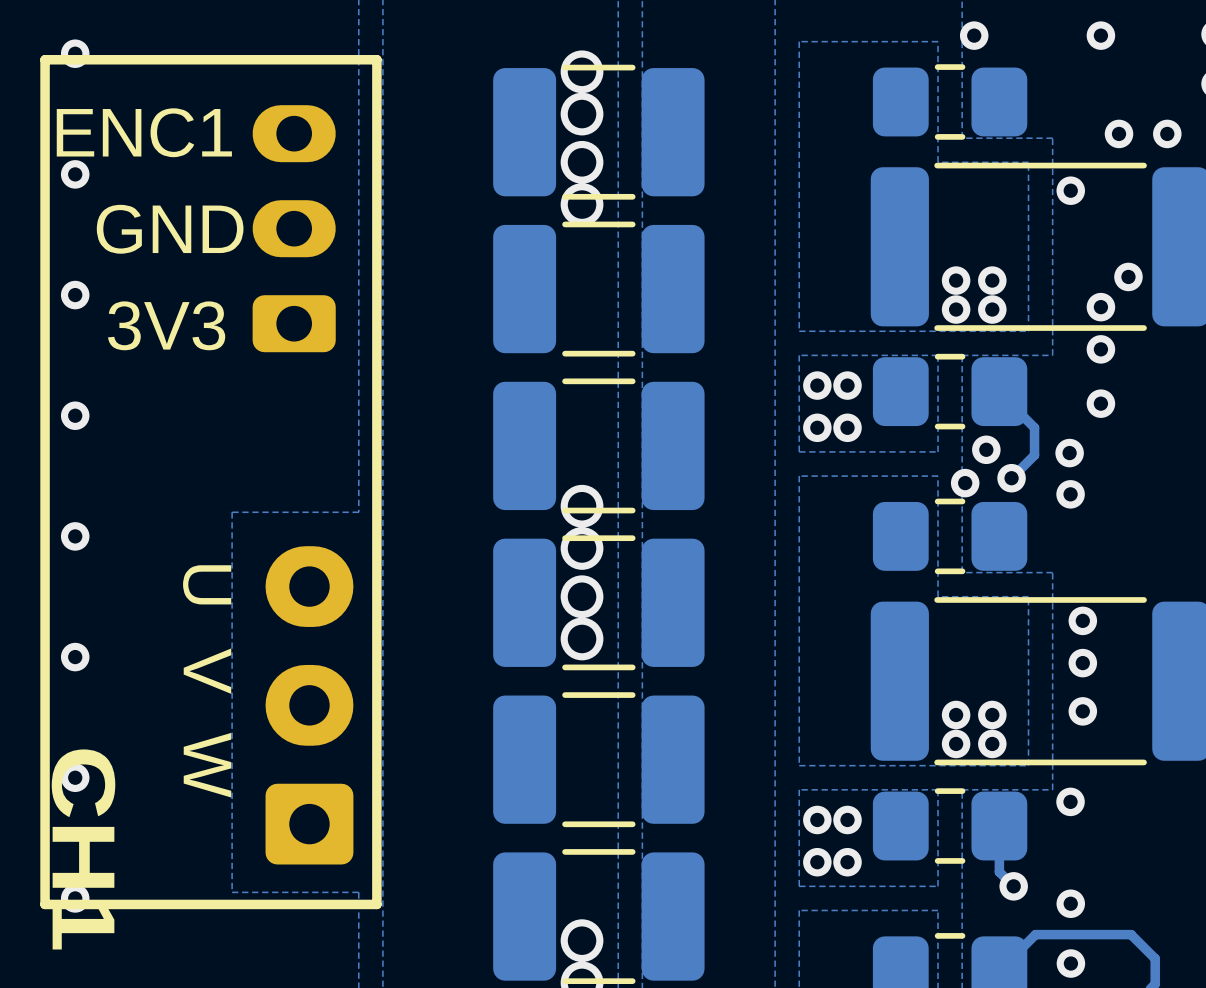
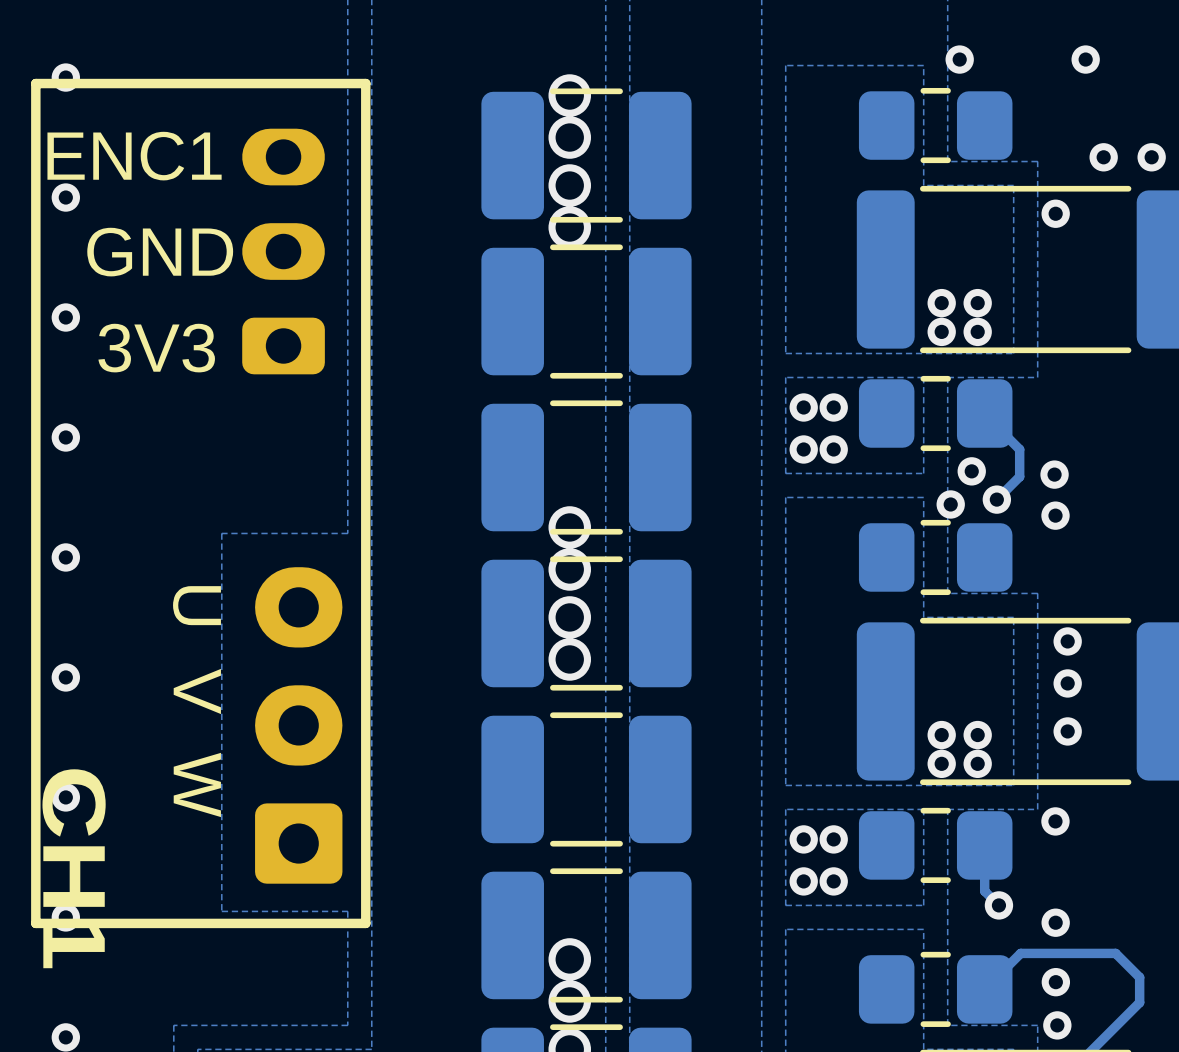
via: (1128, 276) -> none
via: (1100, 307) -> none
via: (1100, 349) -> none
via: (1100, 403) -> none

